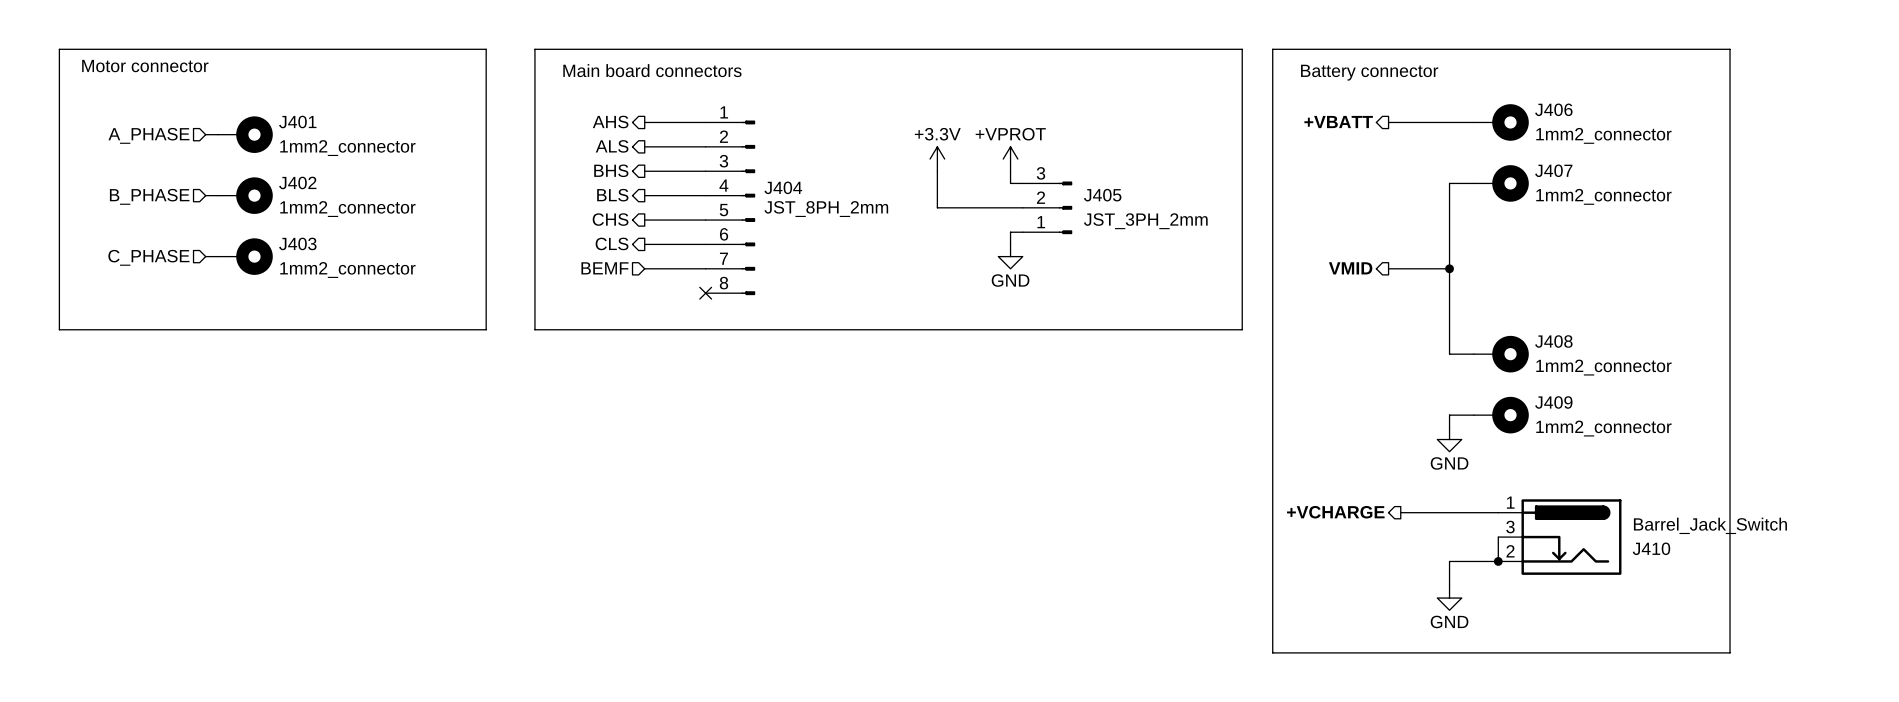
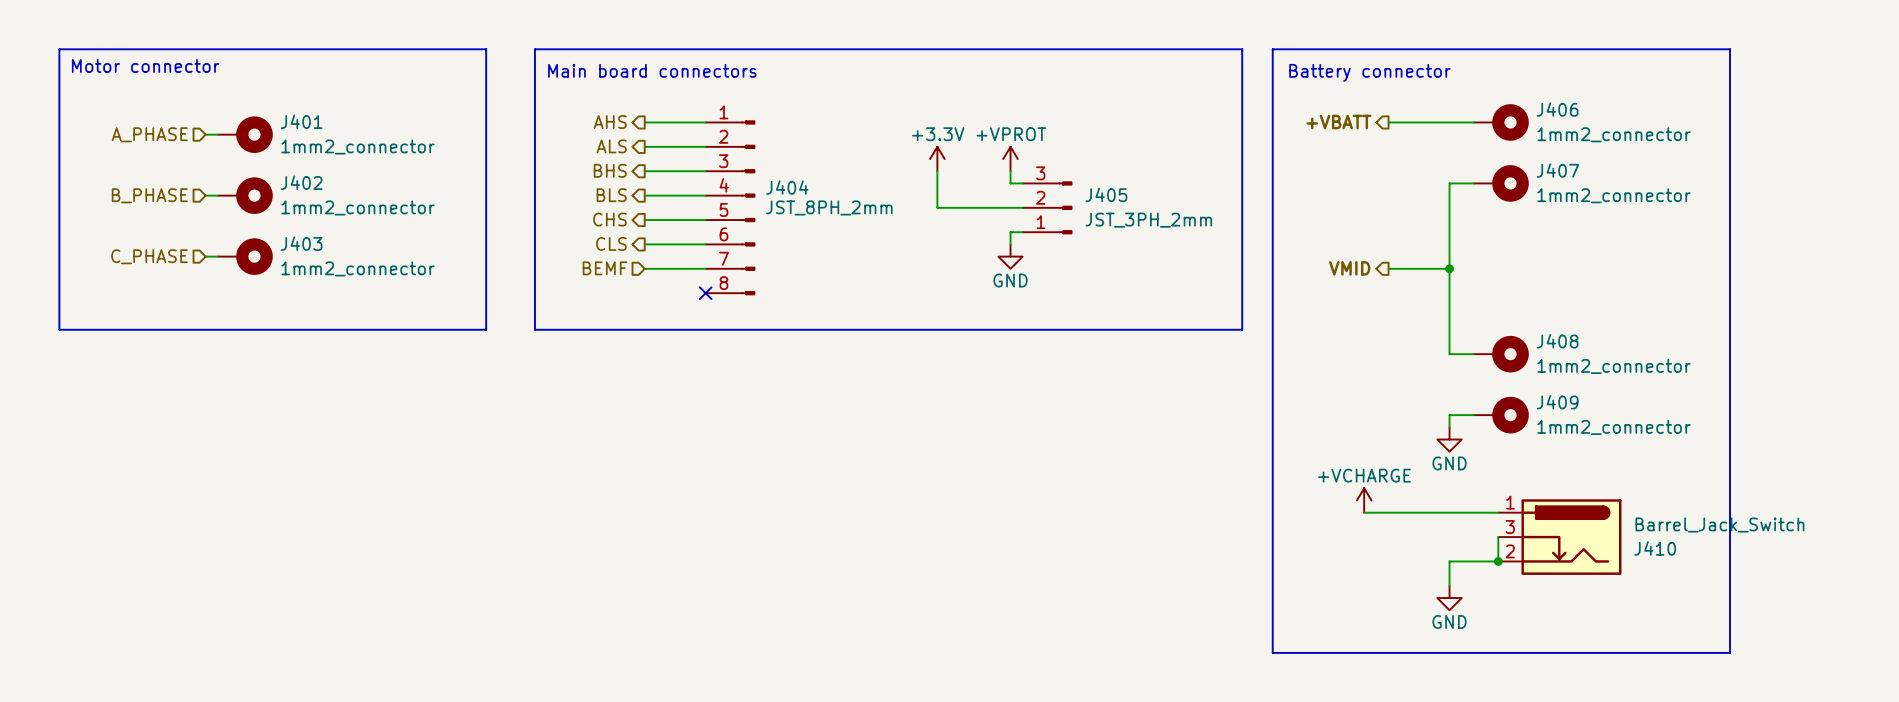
power symbol: none -> +VCHARGE (1364, 500)
hierarchical label: +VCHARGE (1335, 512) -> none
wire: none -> (1364, 512) (1400, 512)

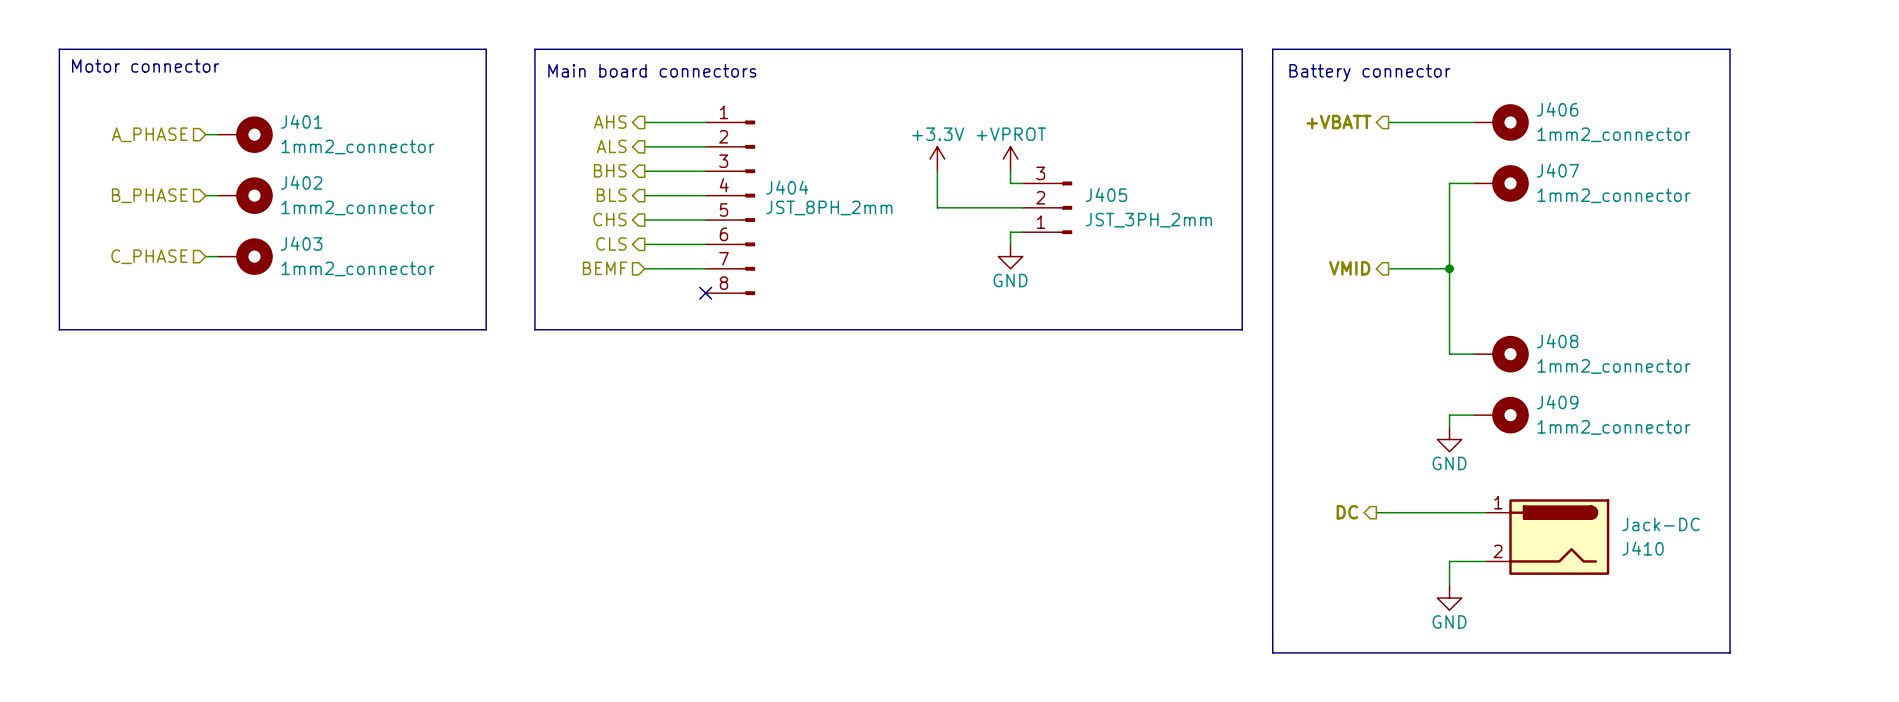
J410 symbol: [1498, 499, 1622, 575] -> [1486, 499, 1610, 575]
power symbol: +VCHARGE (1364, 500) -> none
hierarchical label: none -> DC (1347, 512)
wire: (1364, 512) (1376, 512) -> none
J410 value: Barrel_Jack_Switch (1719, 525) -> Jack-DC (1660, 524)
junction: (1498, 561) -> none

